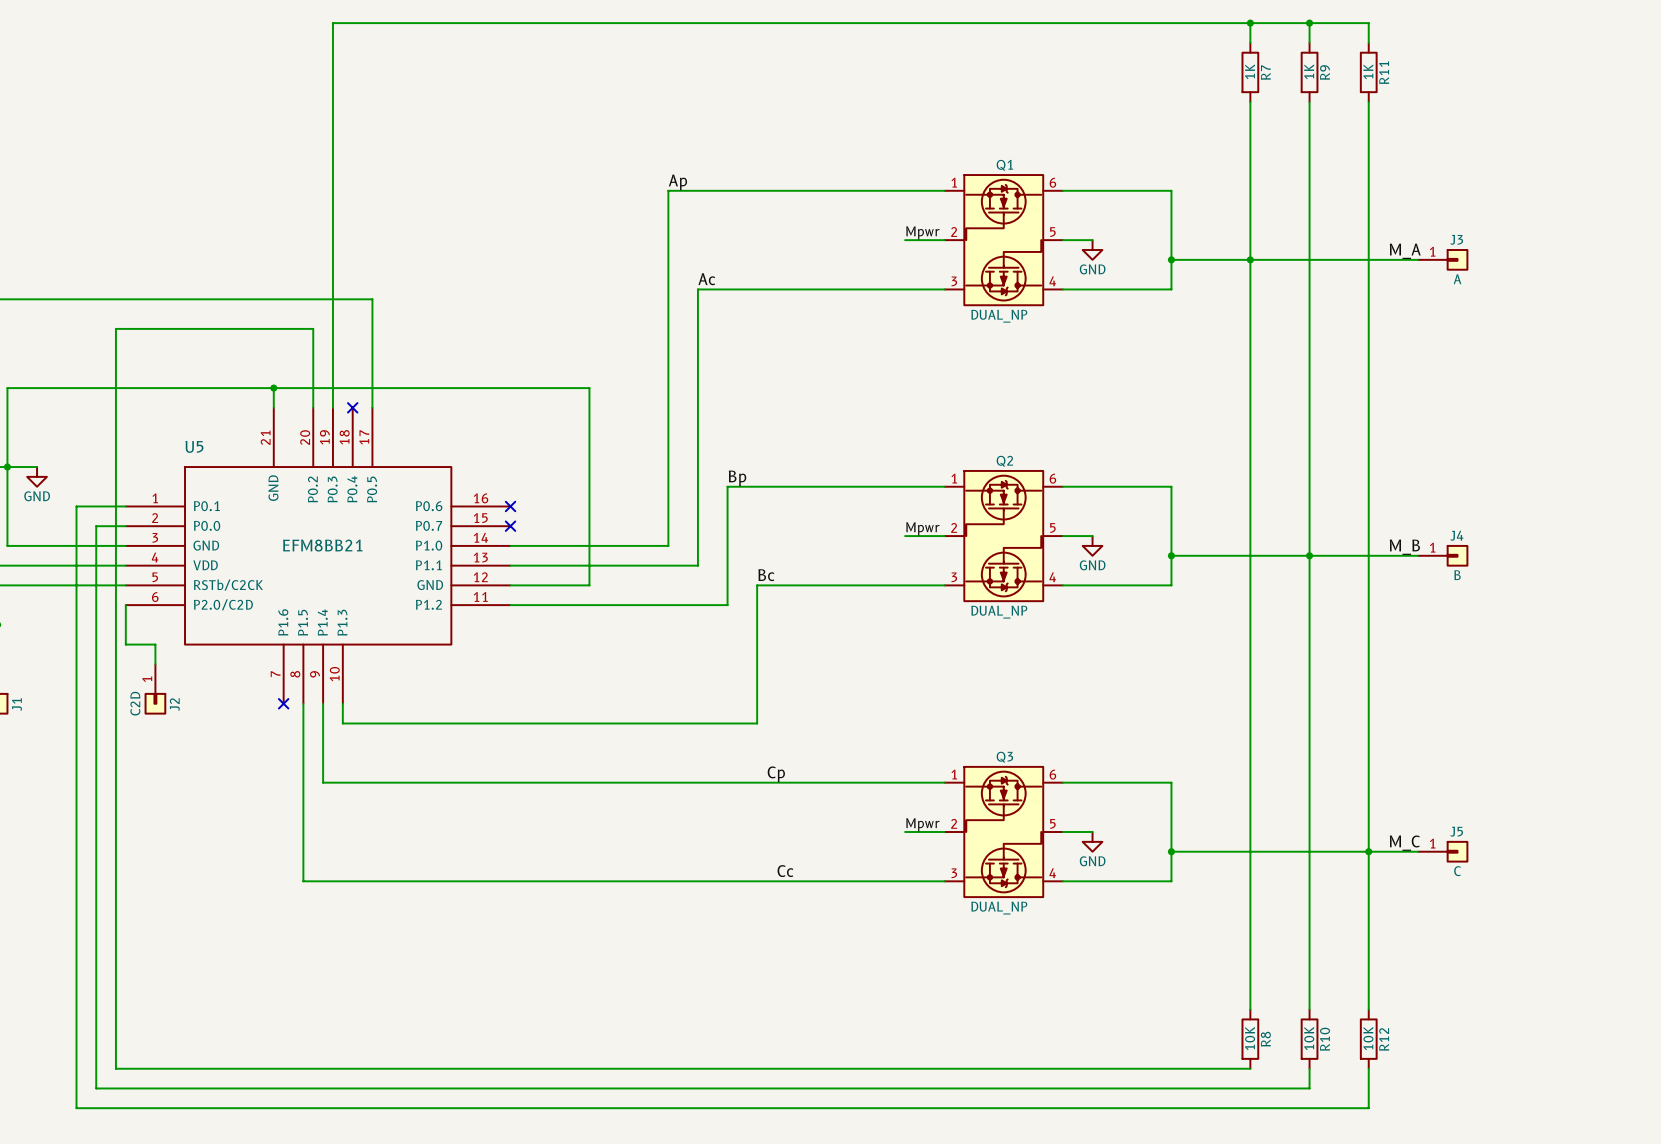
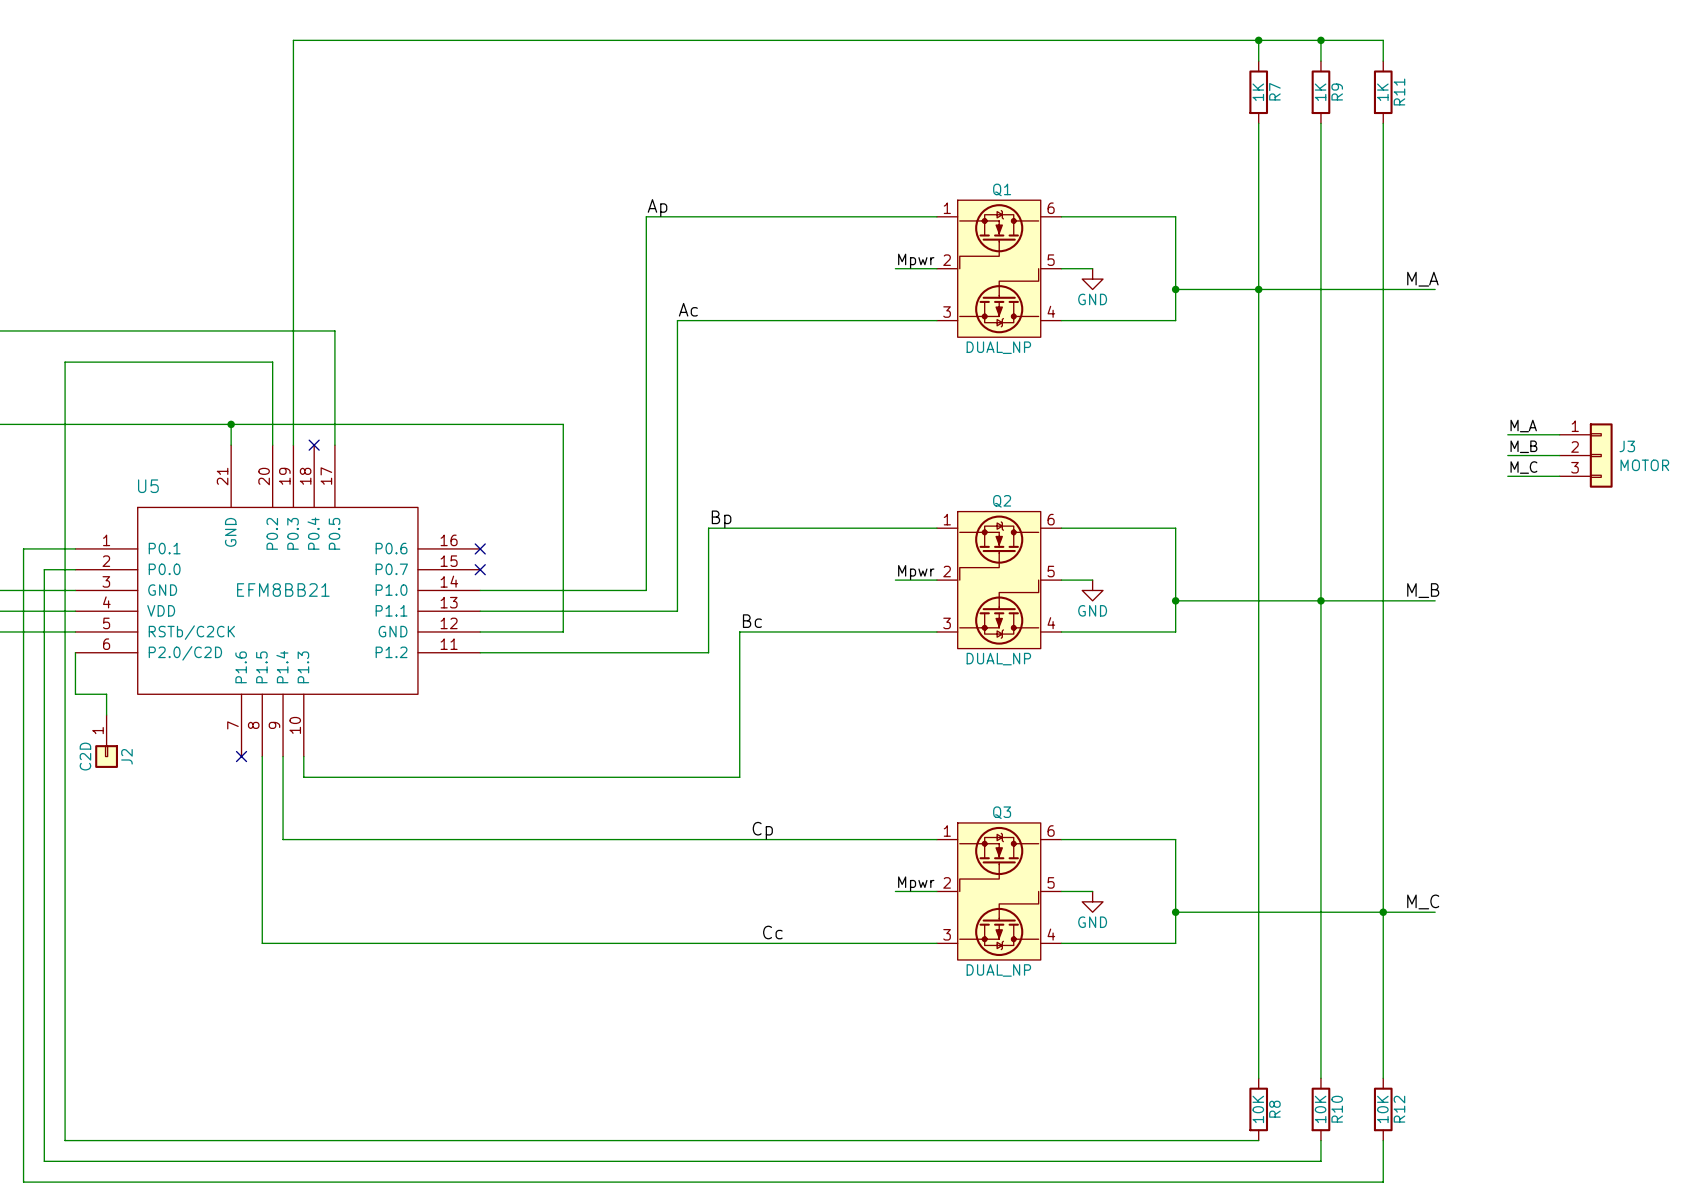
J3 name position: J3 (1456, 239) -> J3 (1627, 446)
J3 symbol: [1418, 249, 1469, 271] -> [1559, 423, 1613, 488]
J3 value: A (1457, 279) -> MOTOR (1644, 465)
label: none -> M_A (1523, 426)
wire: none -> (1507, 434) (1559, 434)
label: none -> M_B (1523, 446)
wire: none -> (1507, 455) (1559, 455)
label: none -> M_C (1523, 467)
wire: none -> (1507, 476) (1559, 476)
J4: B (1443, 555) -> none
J5: C (1443, 851) -> none

